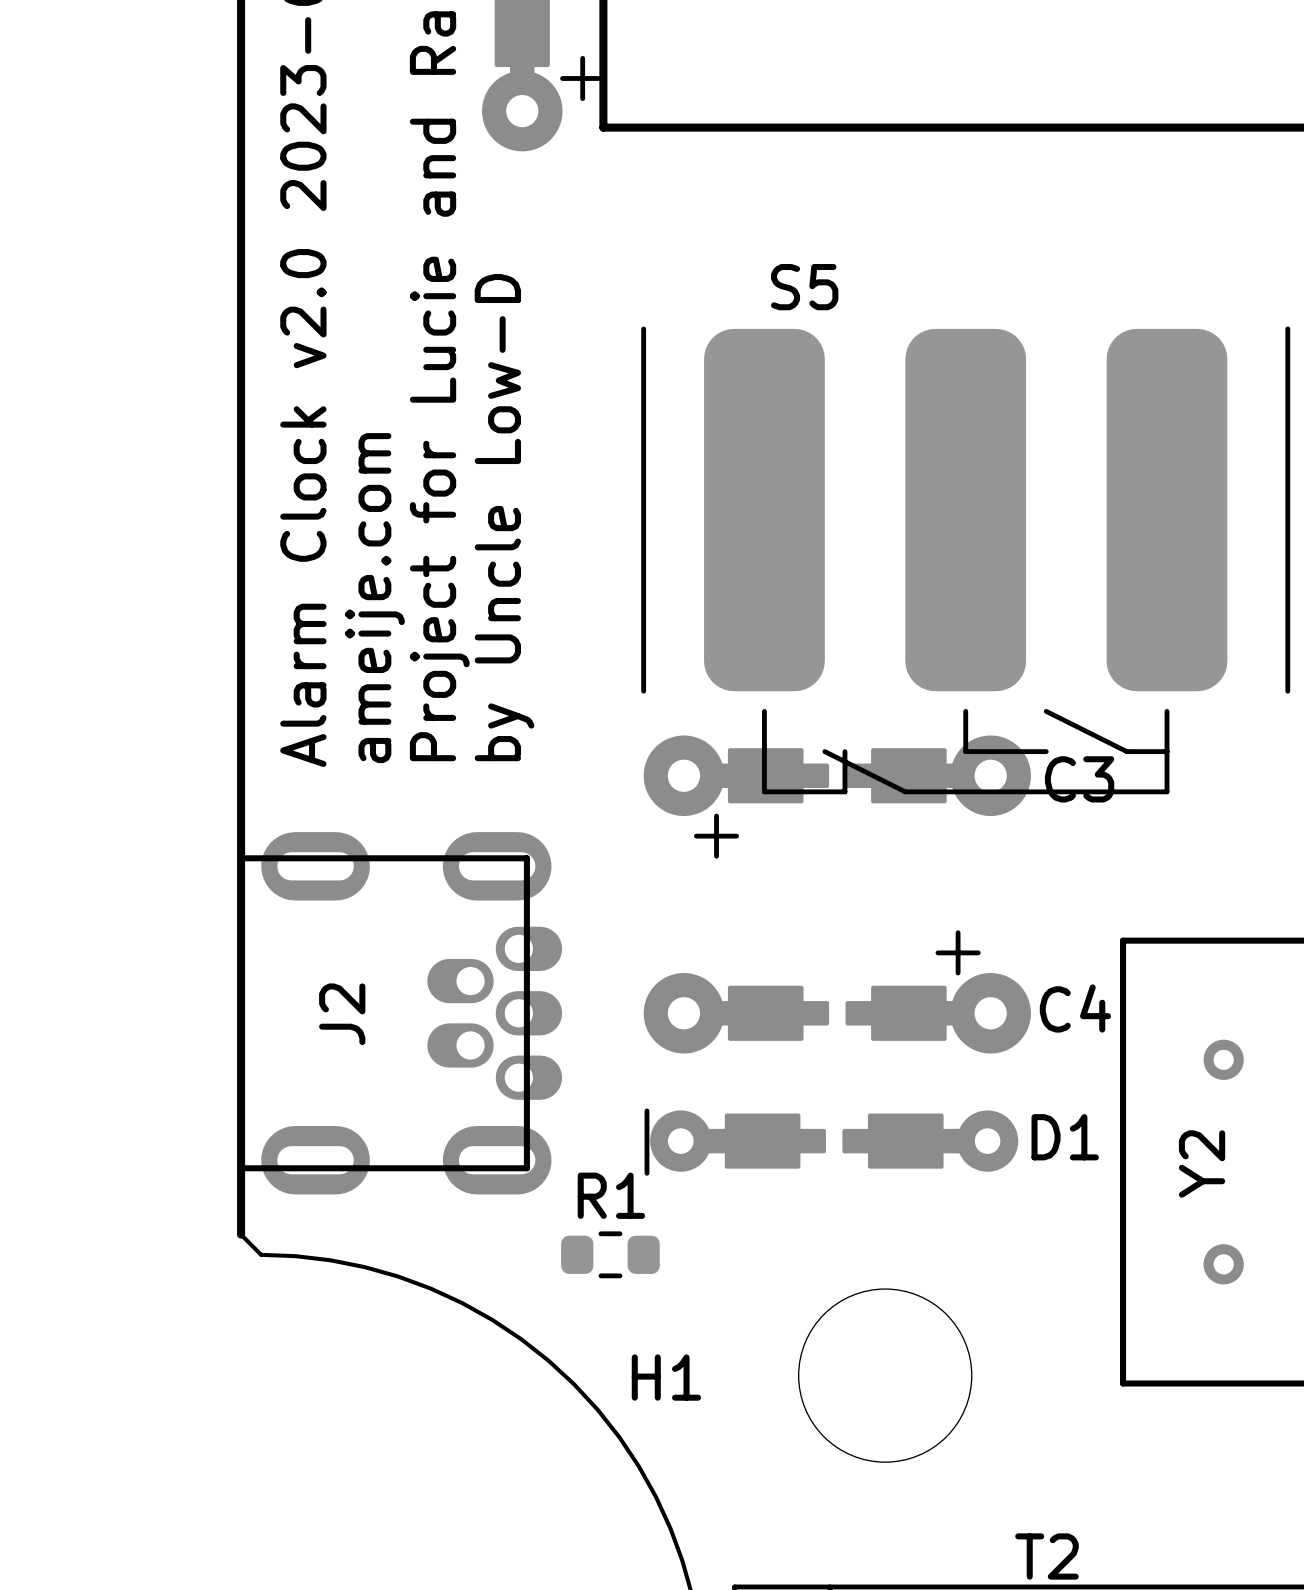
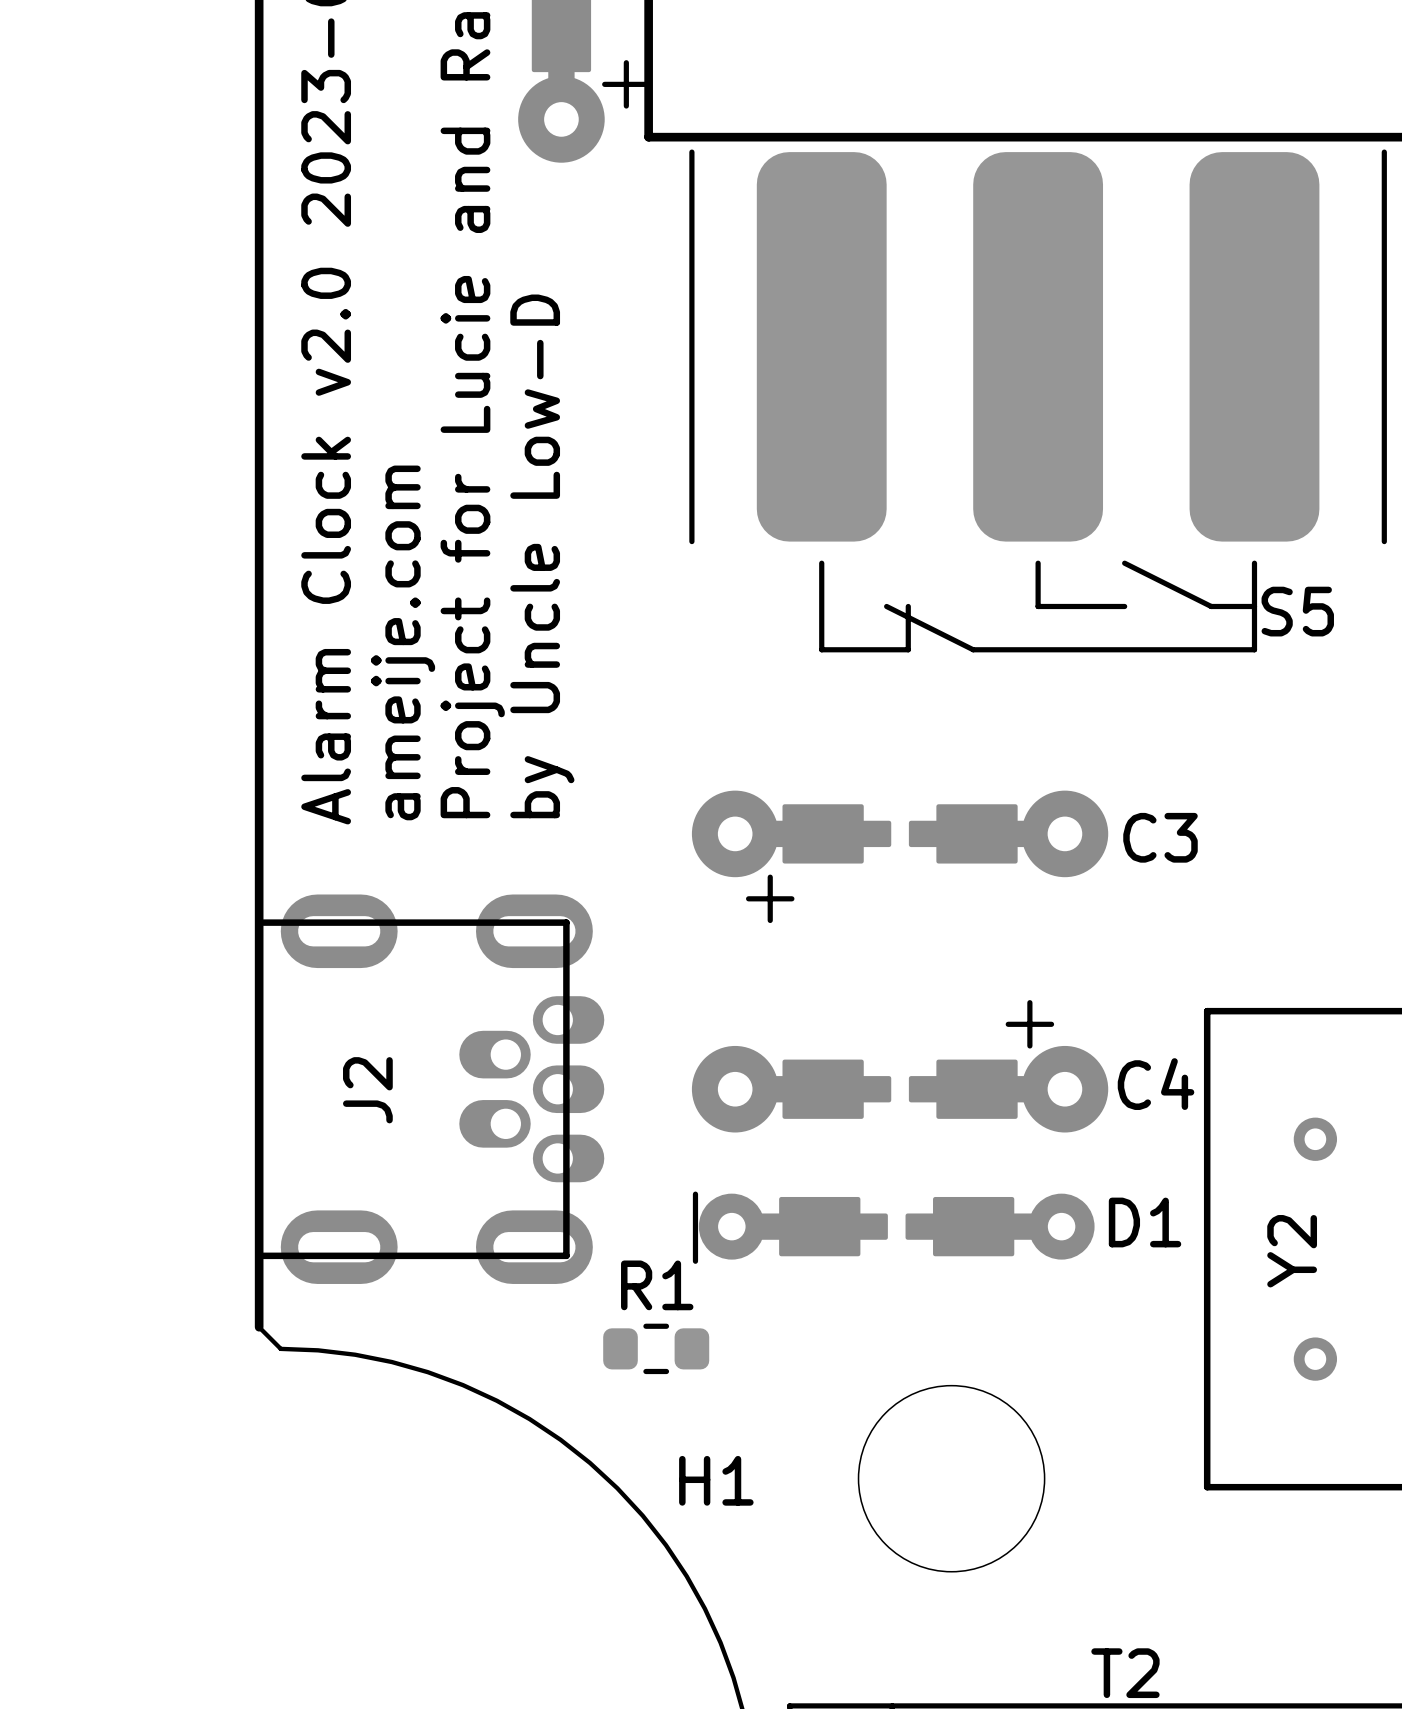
S5 name position: S5 (804, 287) -> S5 (1297, 611)
S5 position: (965, 560) -> (1038, 400)

